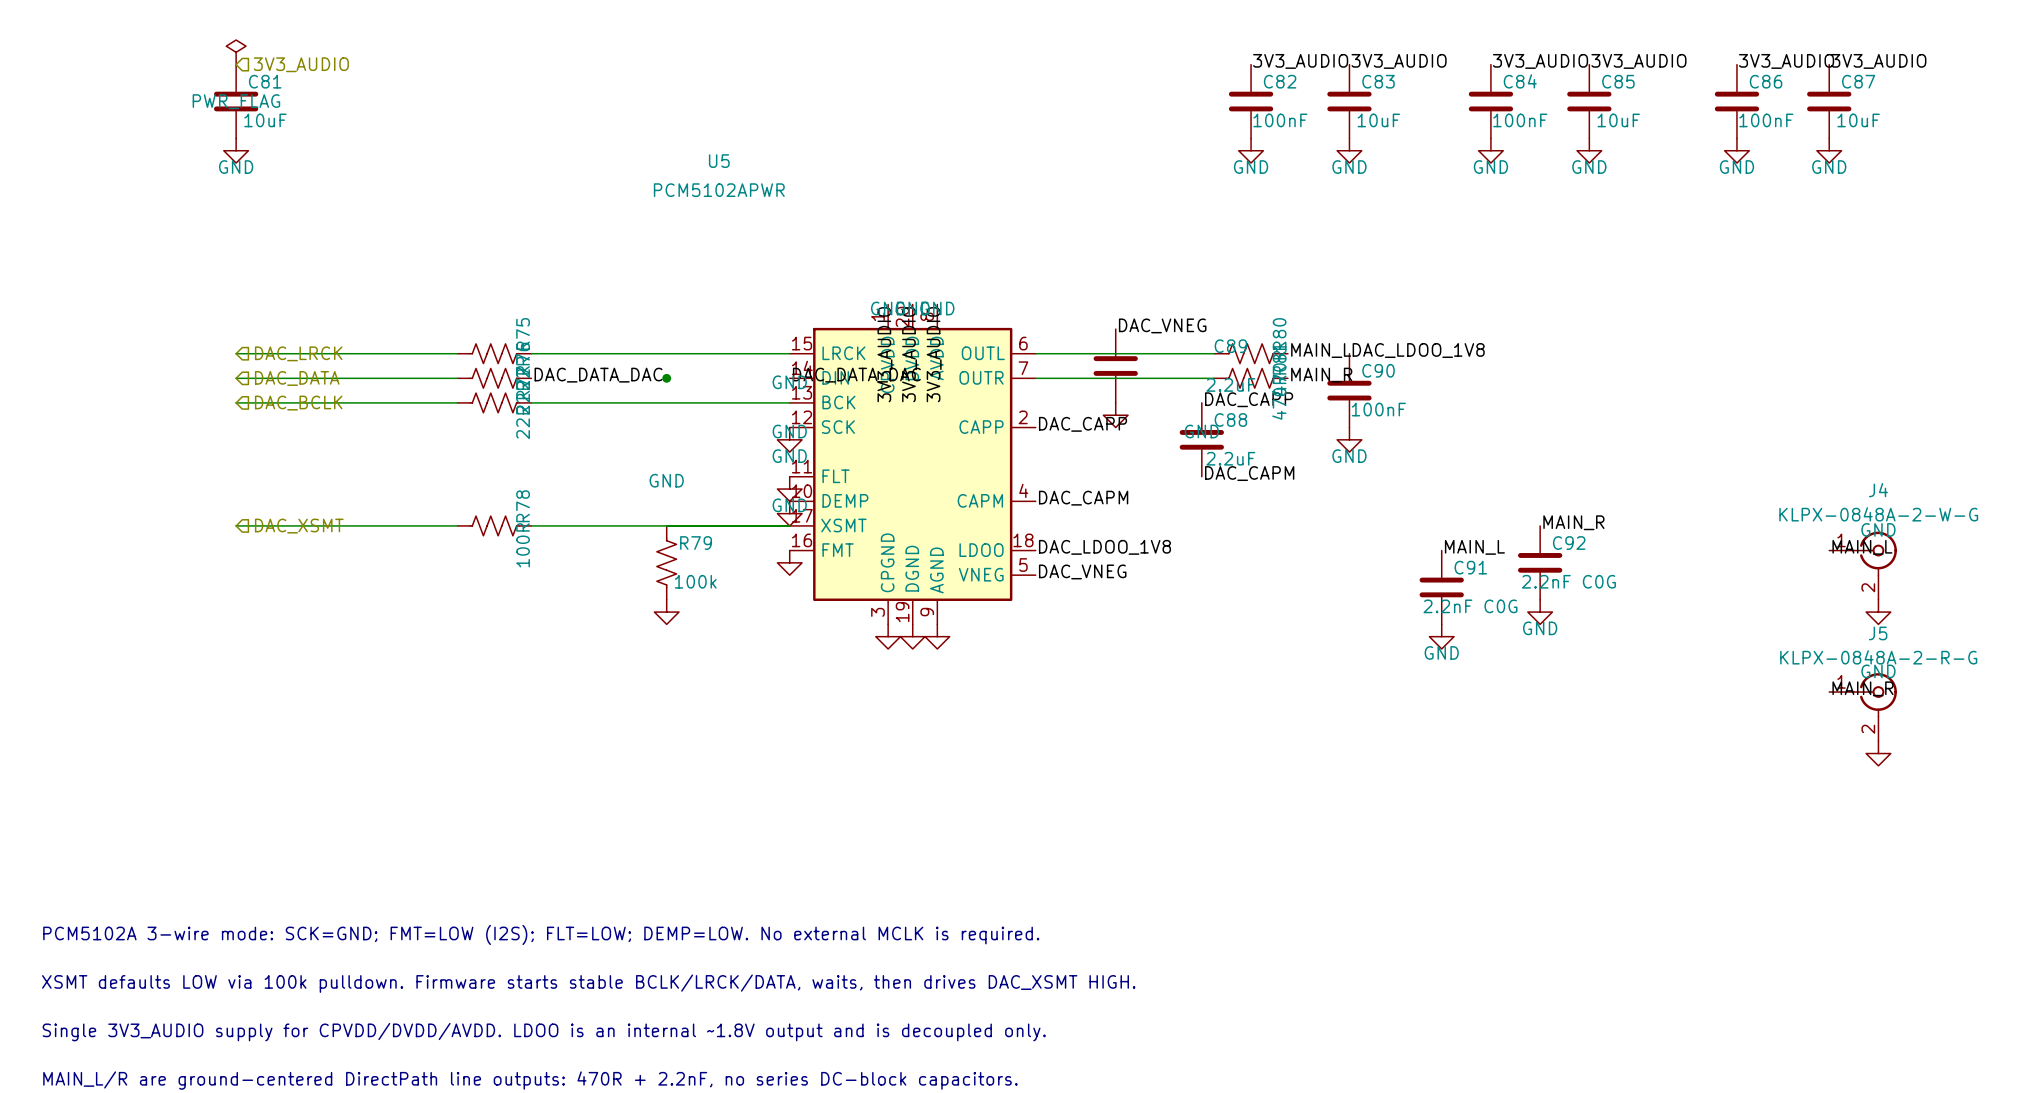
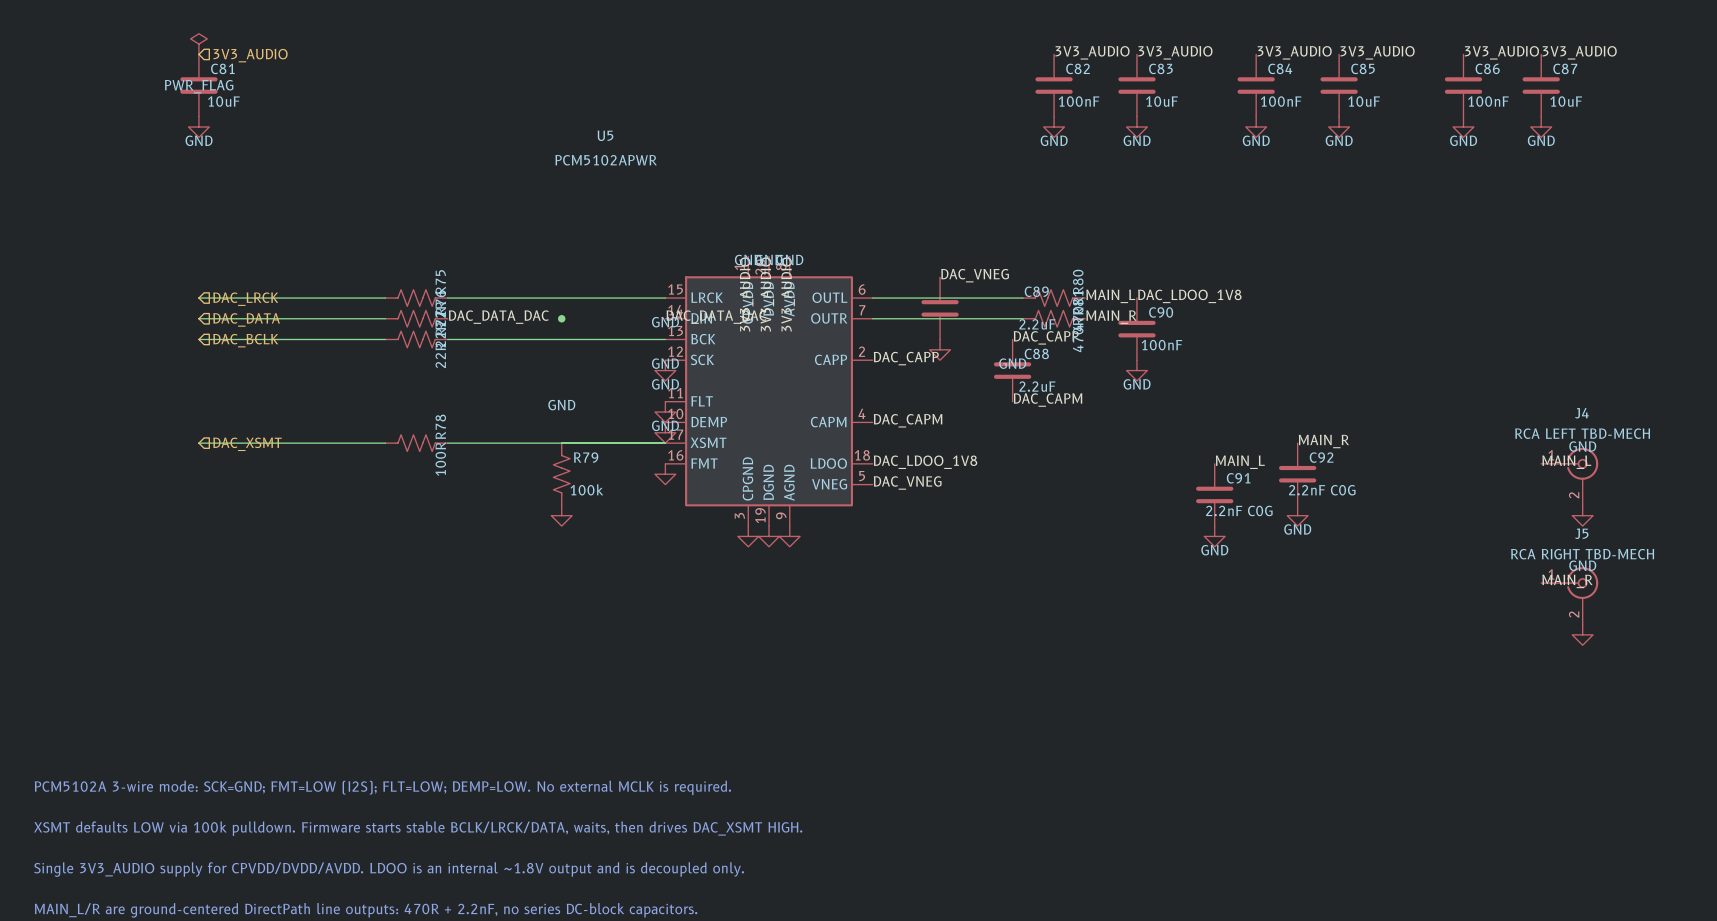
J4 value: KLPX-0848A-2-W-G (1878, 514) -> RCA LEFT TBD-MECH (1582, 433)
J5 value: KLPX-0848A-2-R-G (1878, 657) -> RCA RIGHT TBD-MECH (1582, 554)

